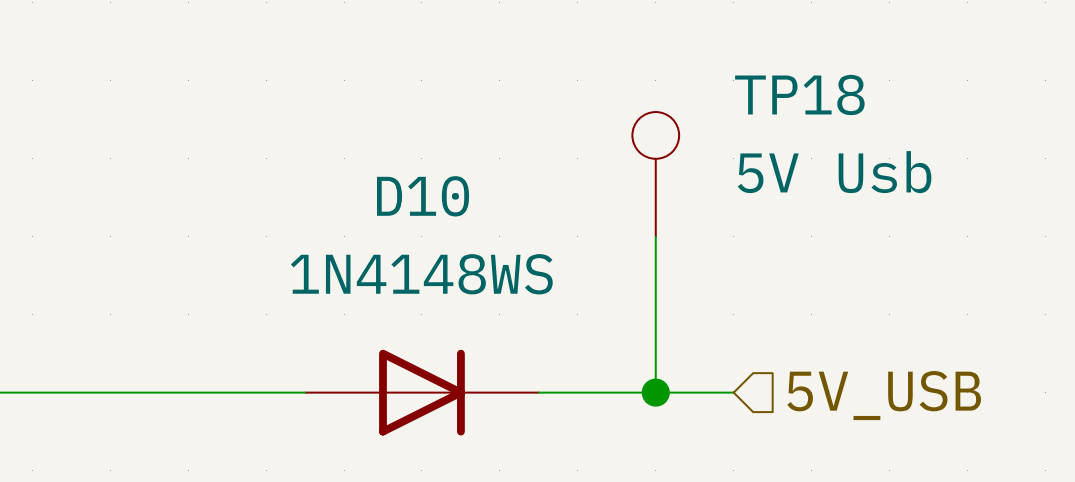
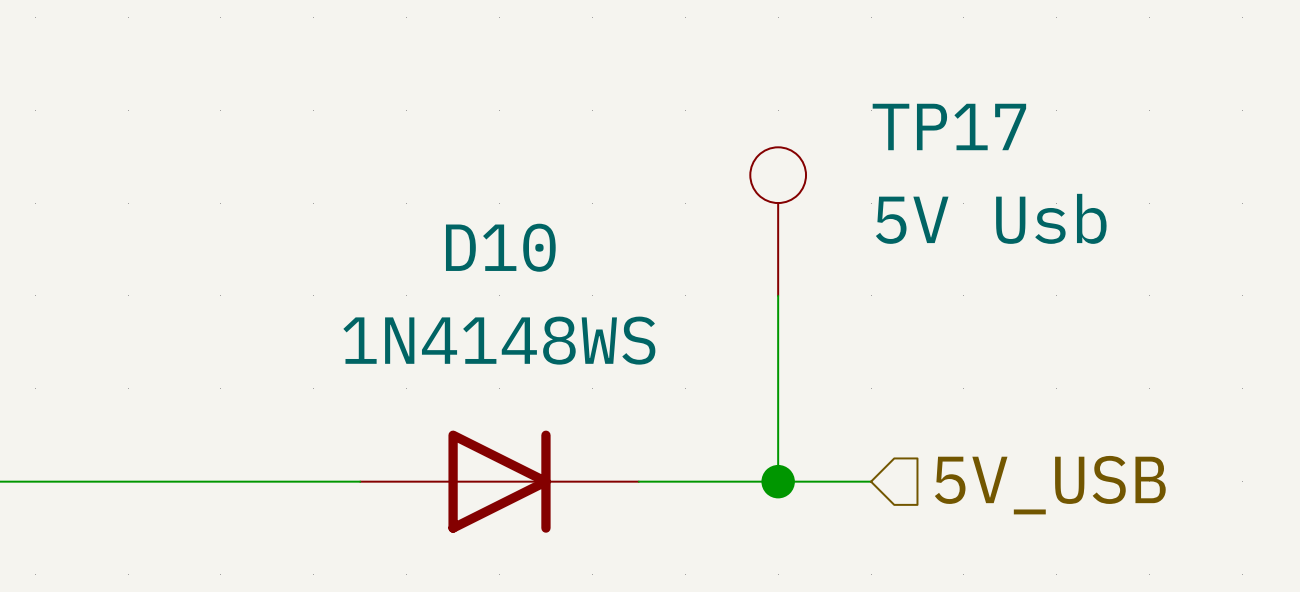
TP18 name: TP18 (799, 94) -> TP17 (949, 126)

